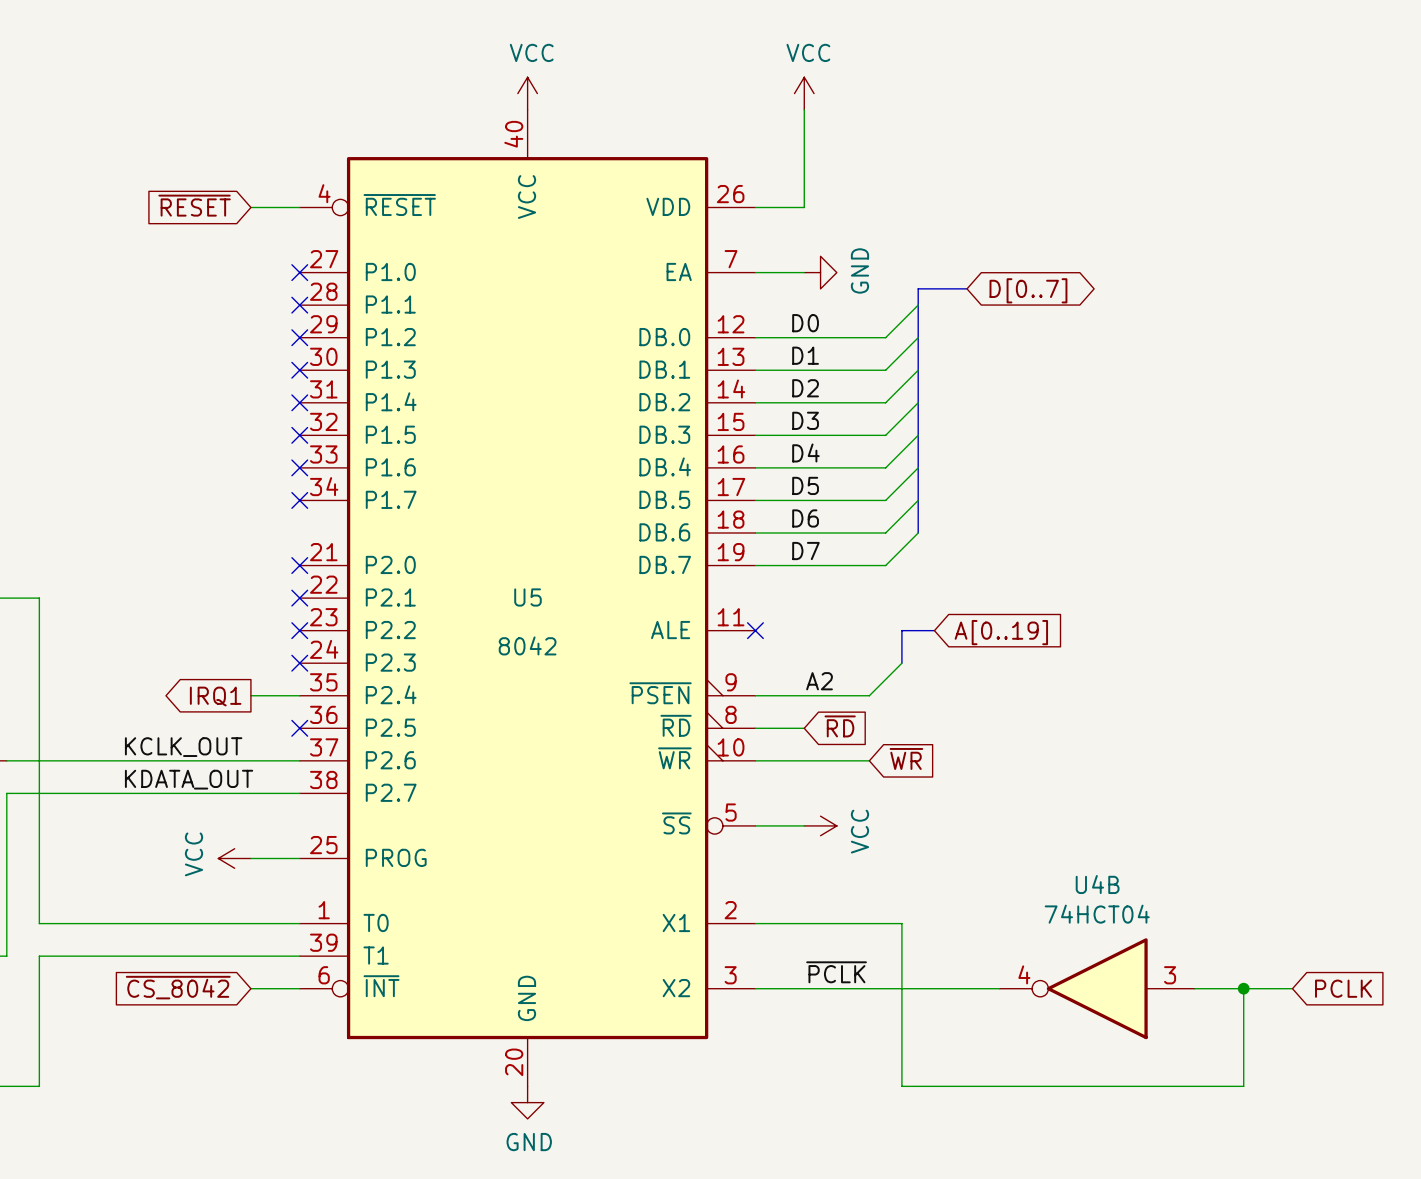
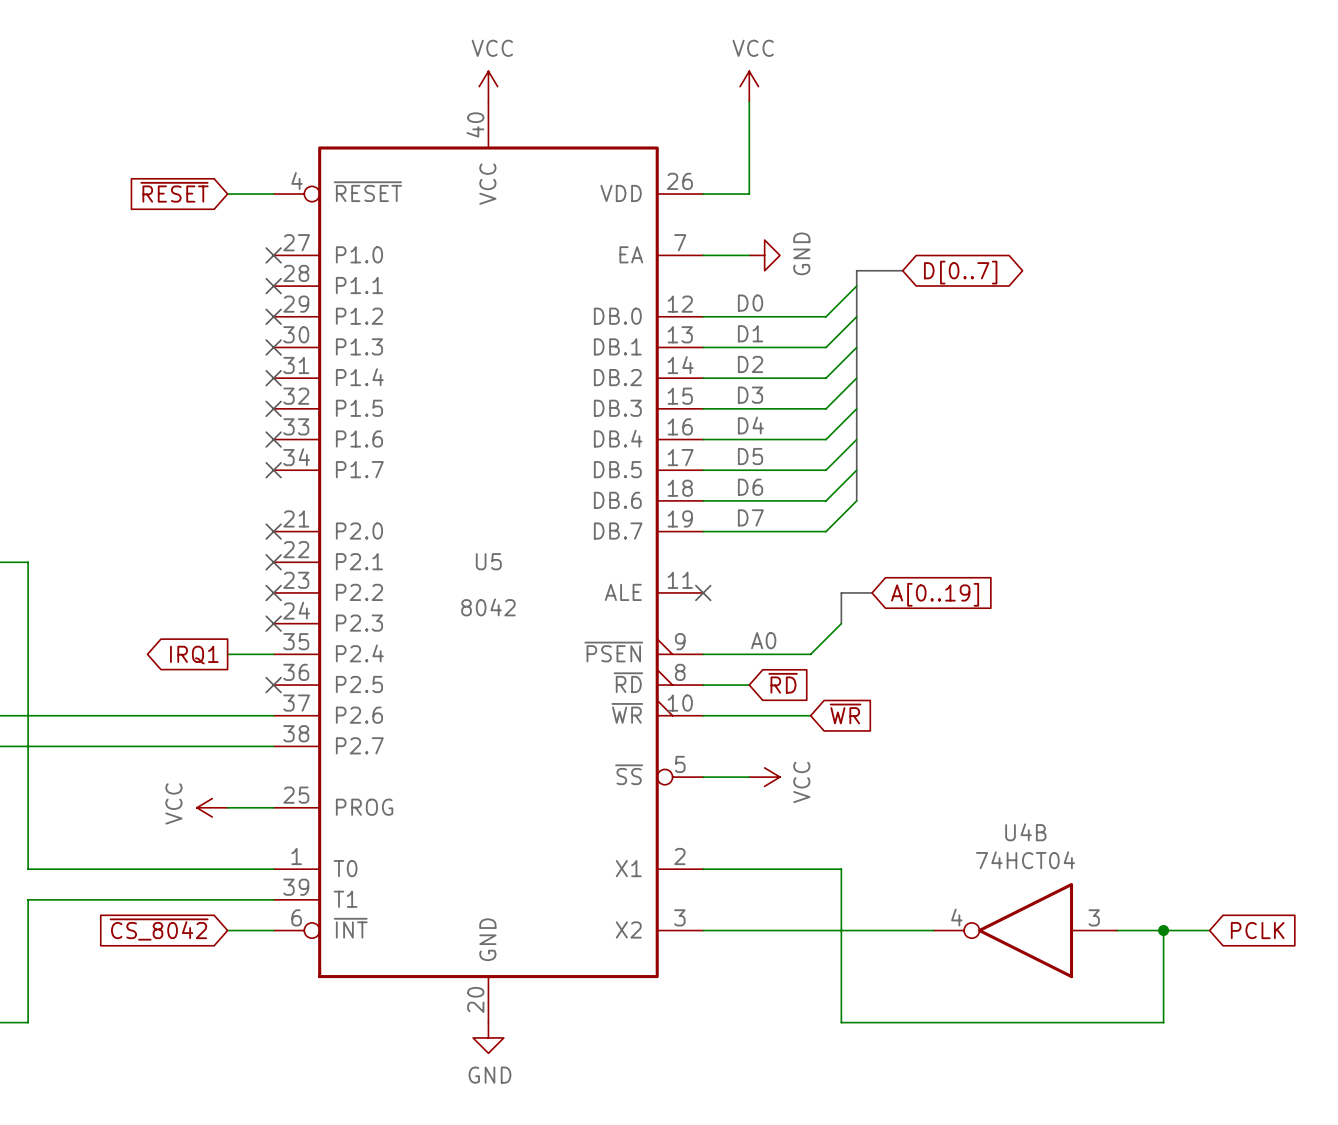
label: A2 (819, 681) -> A0 (763, 640)
label: KCLK_OUT (183, 747) -> none
label: KDATA_OUT (189, 779) -> none
label: ~{PCLK} (836, 972) -> none

